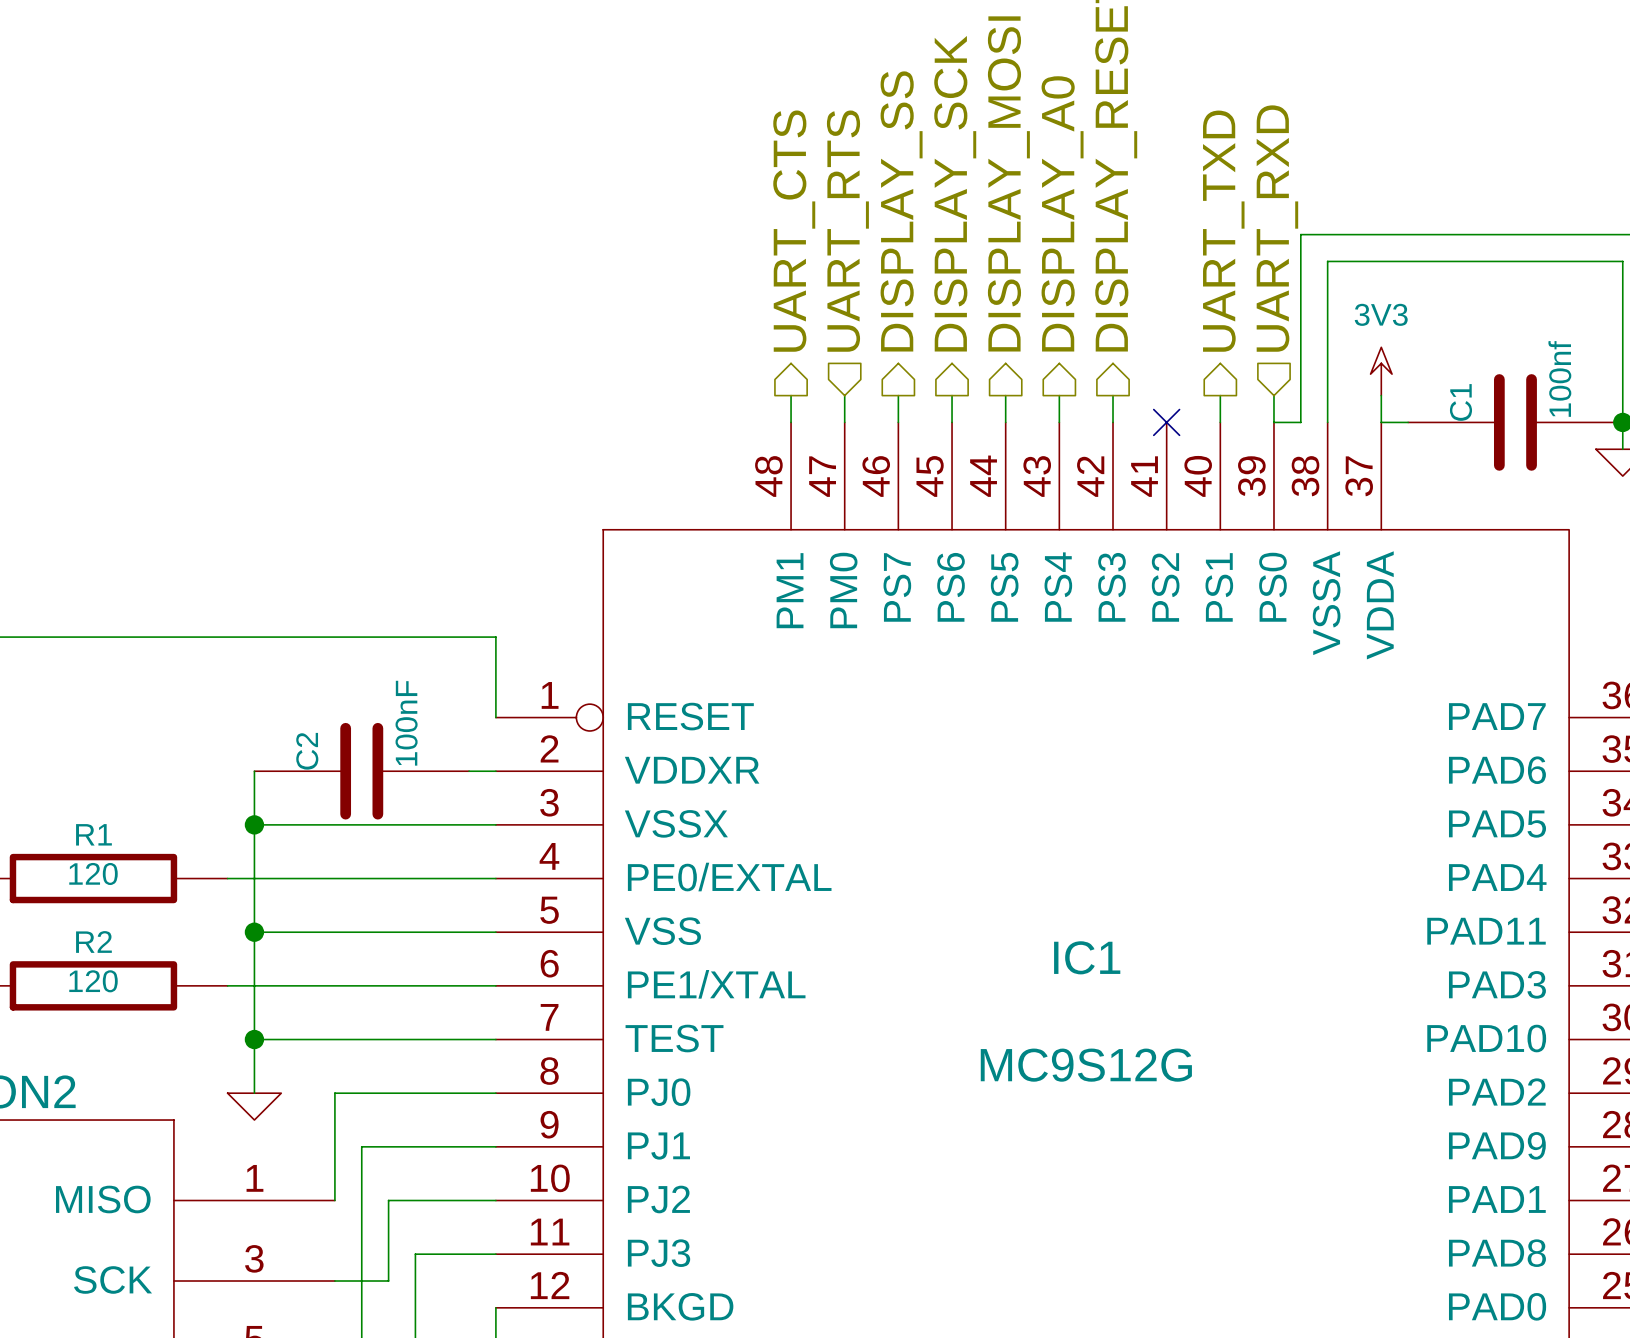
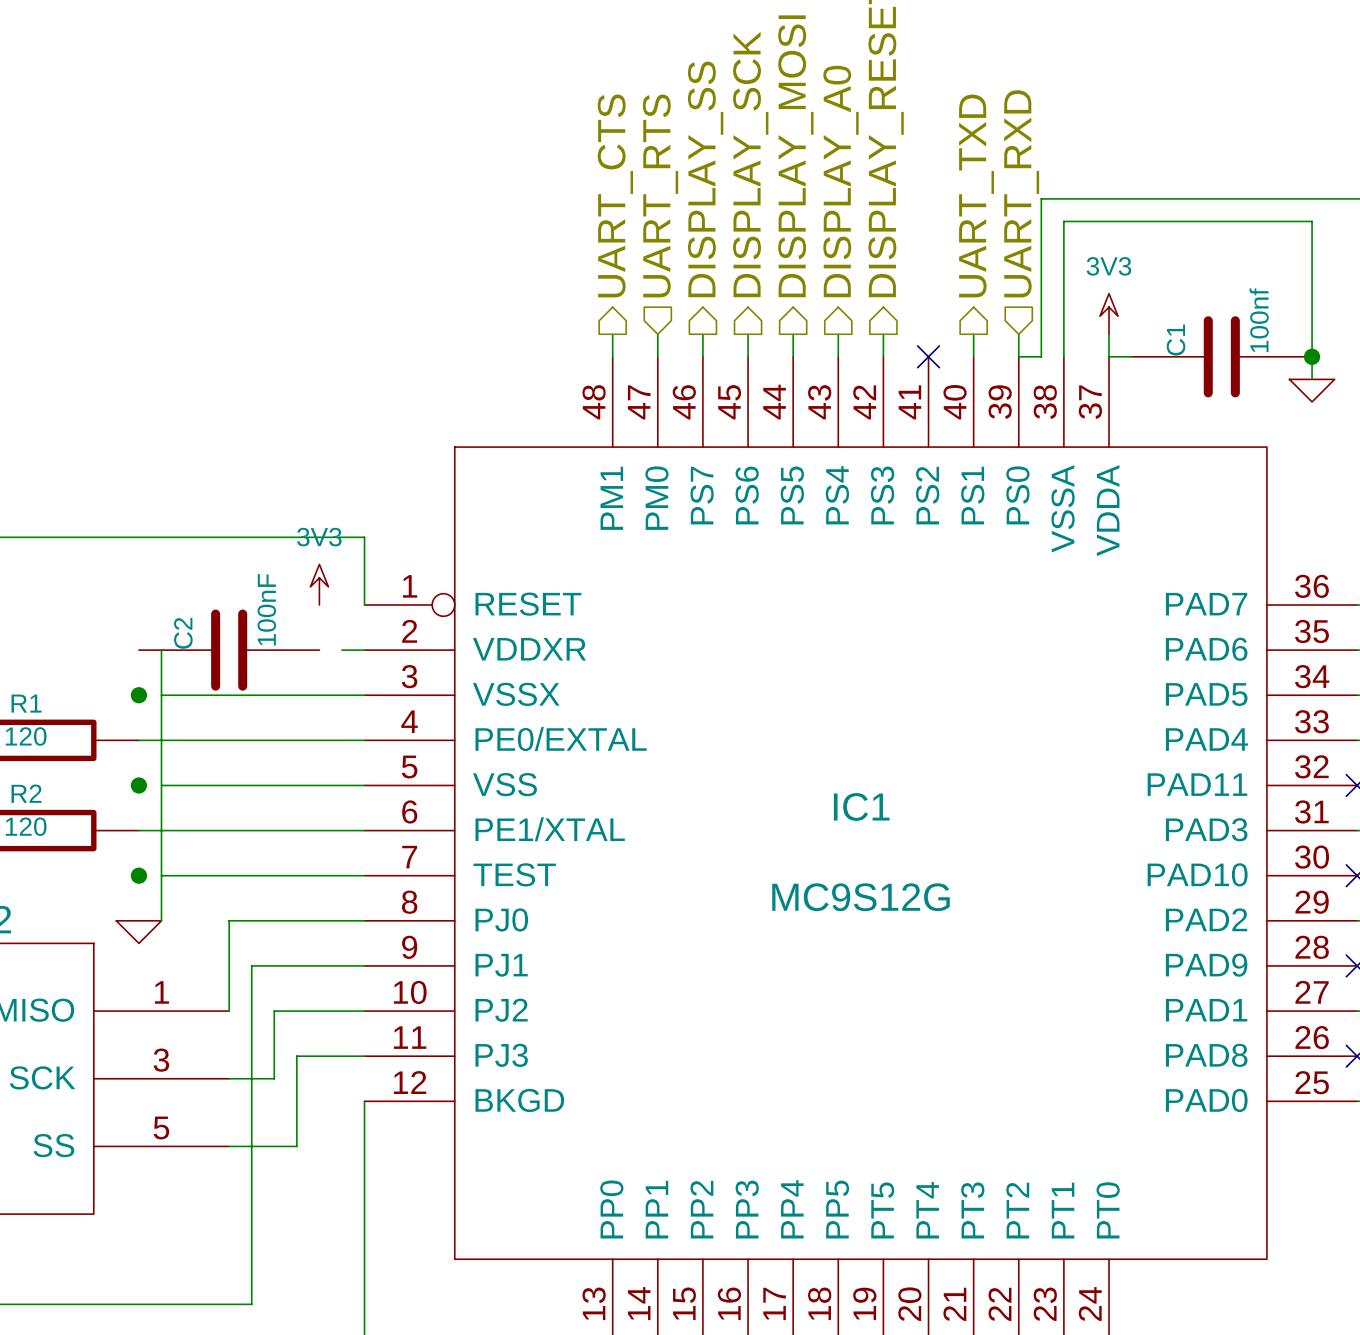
power symbol: none -> 3V3 (319, 584)
C2 position: (361, 771) -> (229, 650)
junction position: (254, 824) -> (138, 695)
junction position: (254, 932) -> (138, 785)
junction position: (254, 1039) -> (138, 875)
power symbol position: (254, 1106) -> (138, 932)

